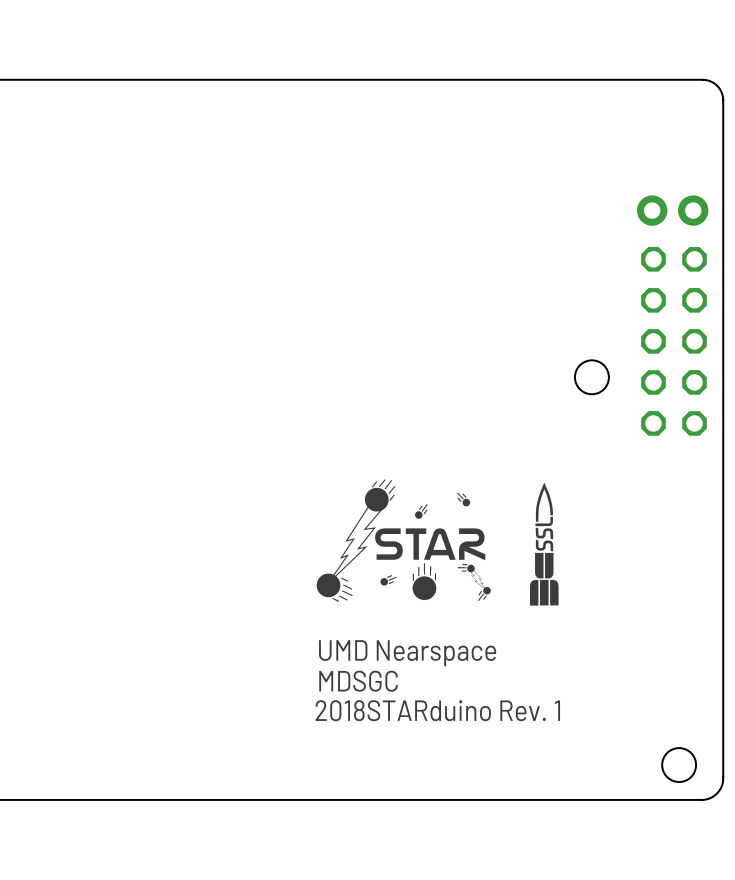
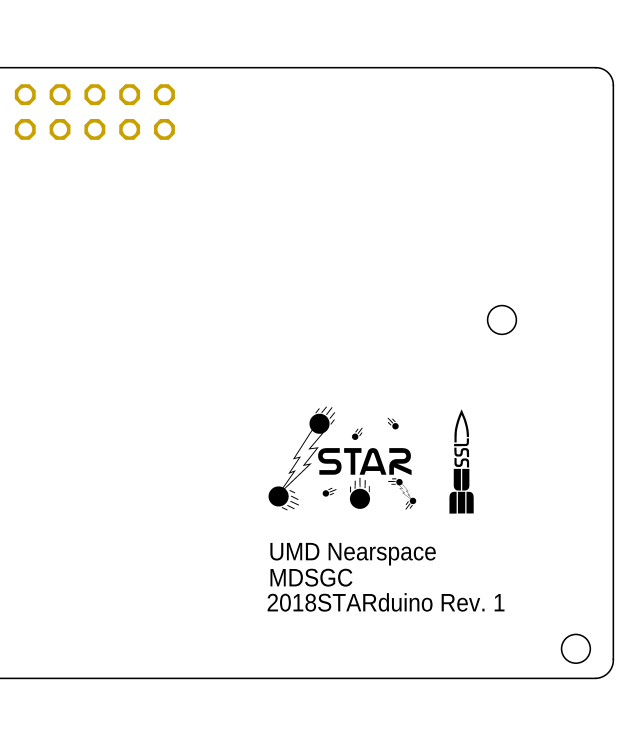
part: none -> (94, 112)
part: (672, 210) -> none
part: (674, 341) -> none

